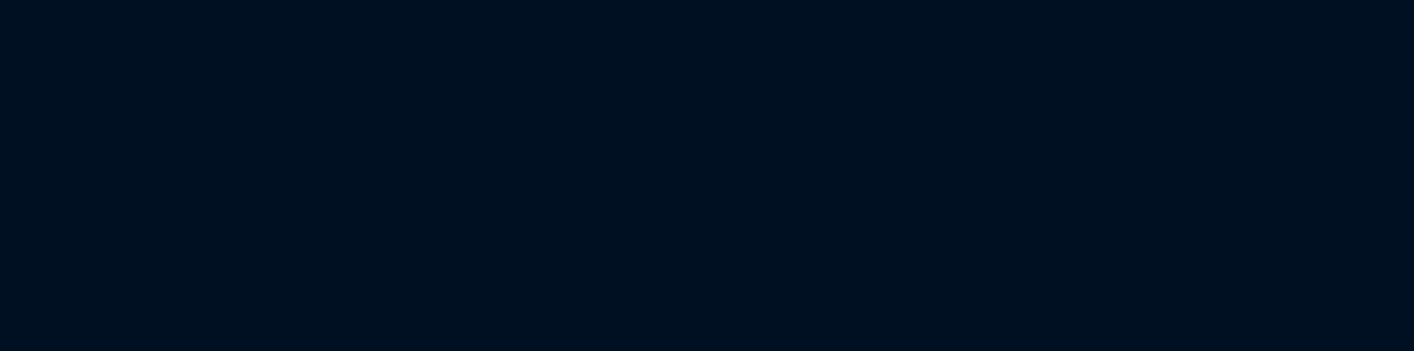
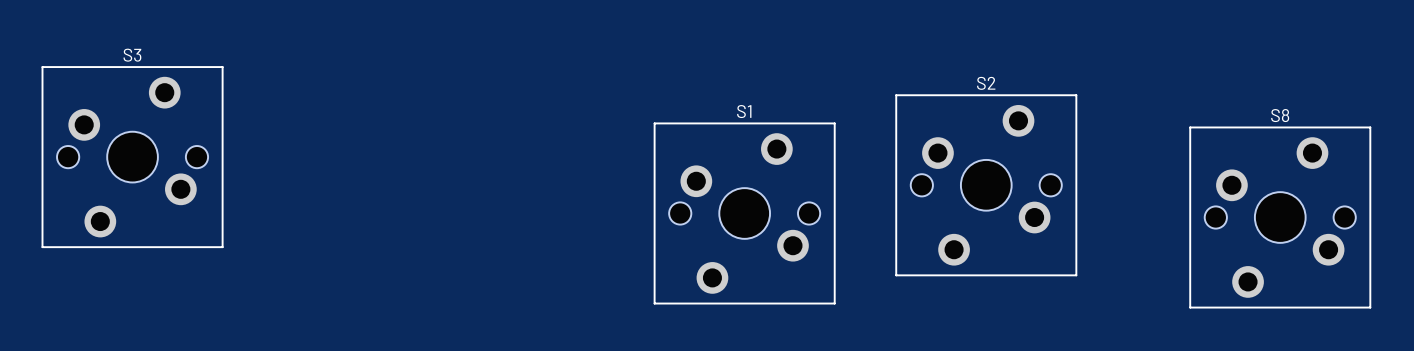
S3: none -> (132, 157)
S2: none -> (986, 185)
S1: none -> (744, 213)
S8: none -> (1280, 217)

